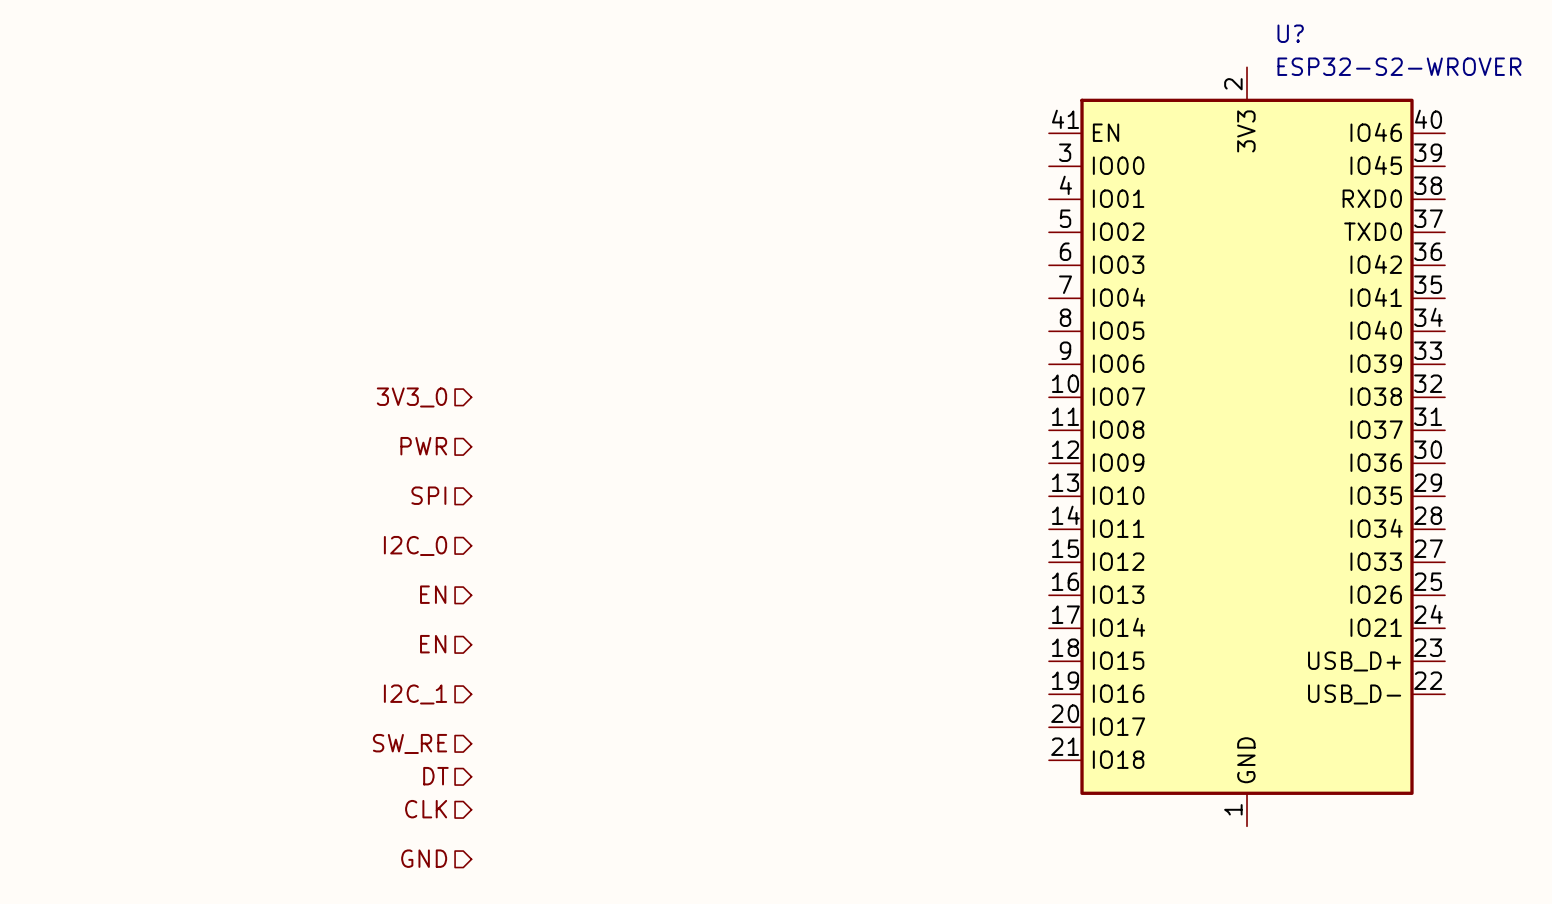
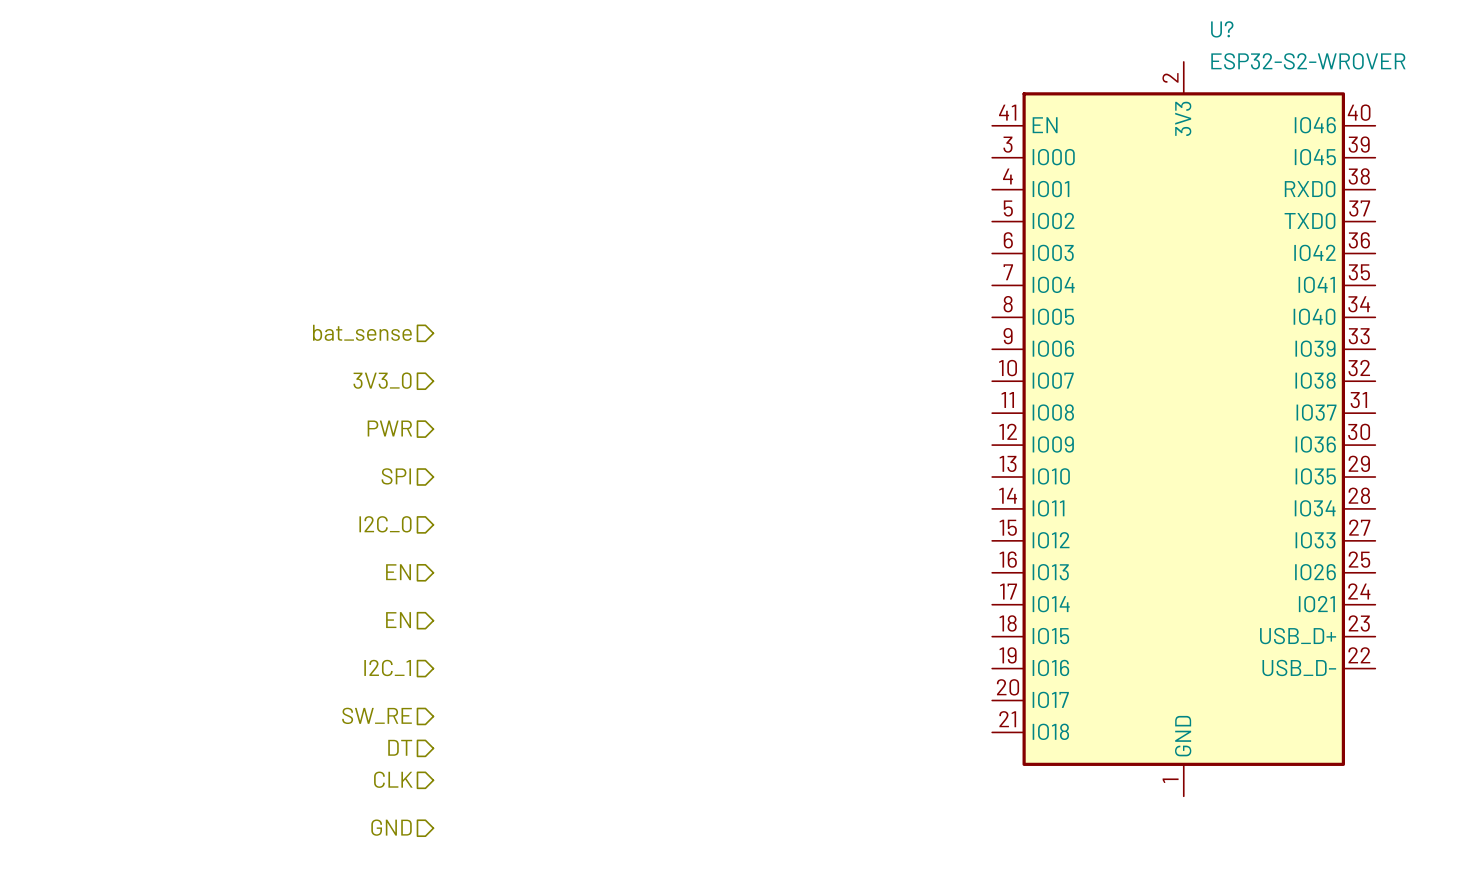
hierarchical label: none -> bat_sense (362, 332)

